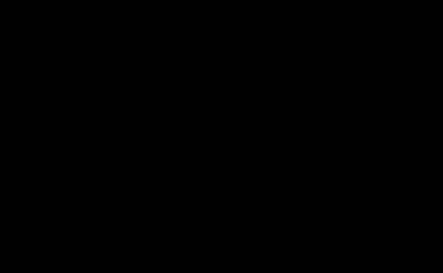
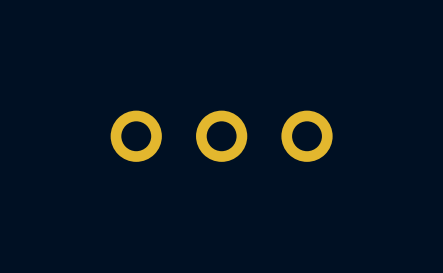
part: none -> (221, 136)

